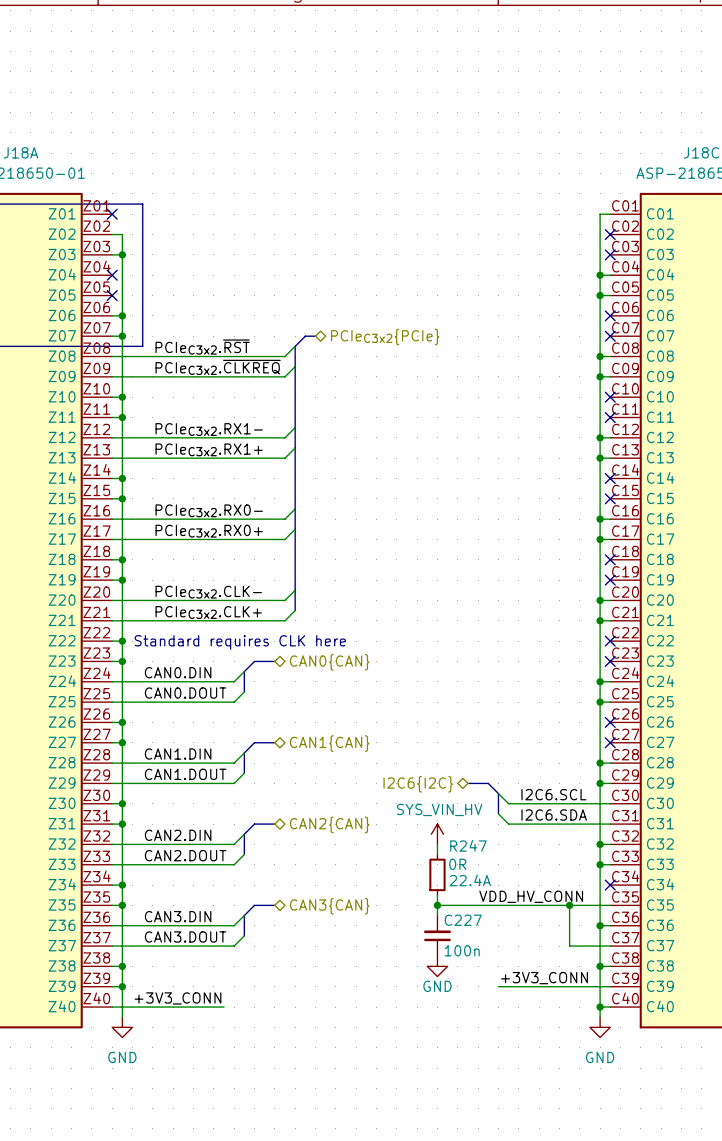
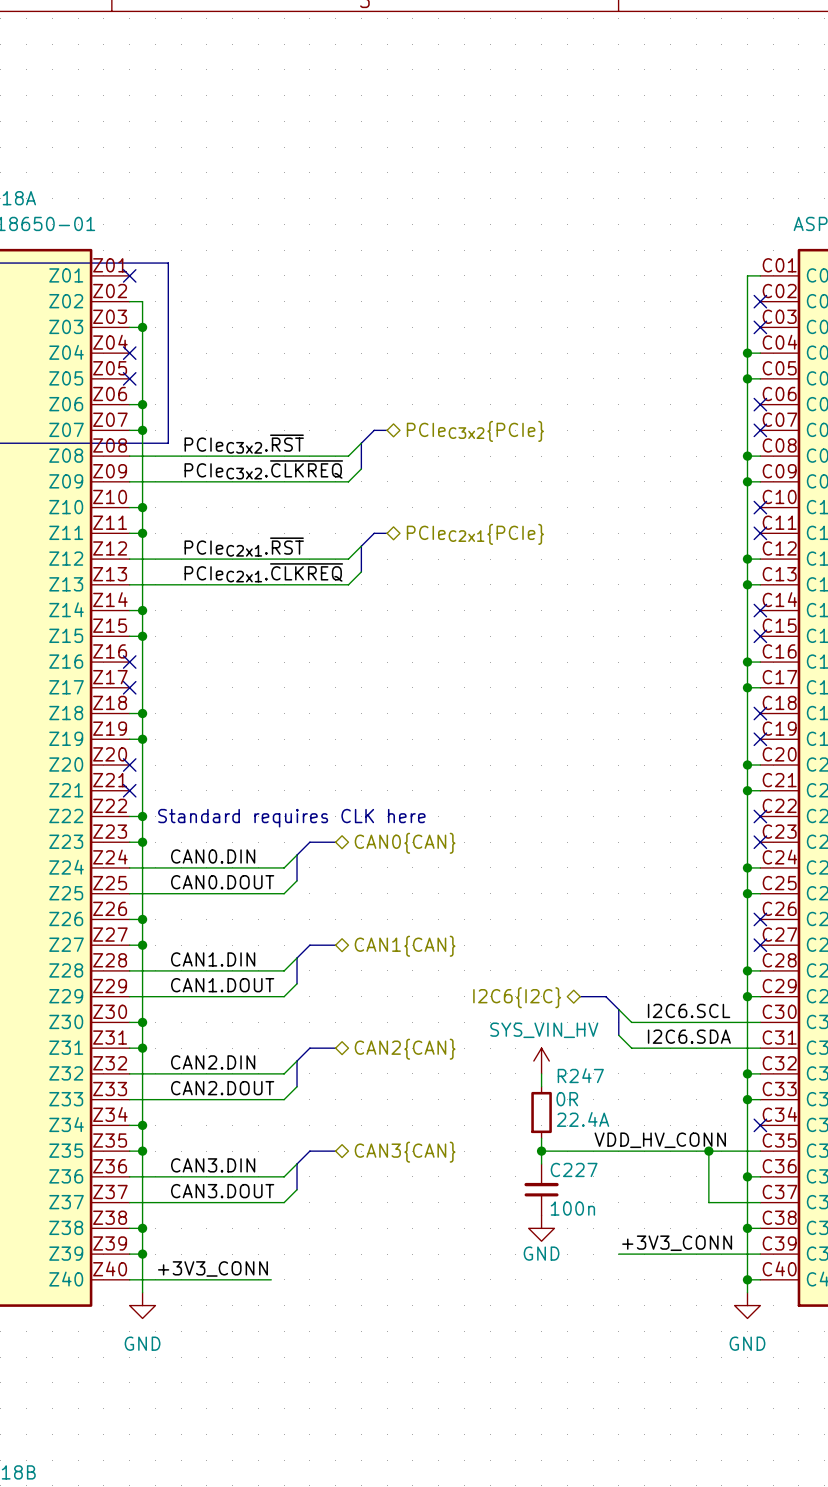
bus: (295, 366) (295, 427) -> (387, 533) (374, 533) (361, 546)
hierarchical label: none -> PCIeC2x1{PCIe} (475, 534)
label: PCIeC3x2.RX1- (209, 429) -> PCIeC2x1.~{RST} (244, 547)
bus: (295, 448) (295, 610) -> none
label: PCIeC3x2.RX1+ (209, 449) -> PCIeC2x1.~{CLKREQ} (263, 572)
wire: (295, 508) (285, 519) (112, 519) -> none
label: PCIeC3x2.RX0- (209, 510) -> none
no-connect mark: none -> (129, 662)
wire: (295, 529) (285, 539) (112, 539) -> none
label: PCIeC3x2.RX0+ (209, 531) -> none
no-connect mark: none -> (129, 687)
wire: (295, 590) (285, 600) (112, 600) -> none
label: PCIeC3x2.CLK- (208, 592) -> none
no-connect mark: none -> (129, 765)
wire: (295, 610) (285, 620) (112, 620) -> none
label: PCIeC3x2.CLK+ (208, 612) -> none
no-connect mark: none -> (129, 790)

